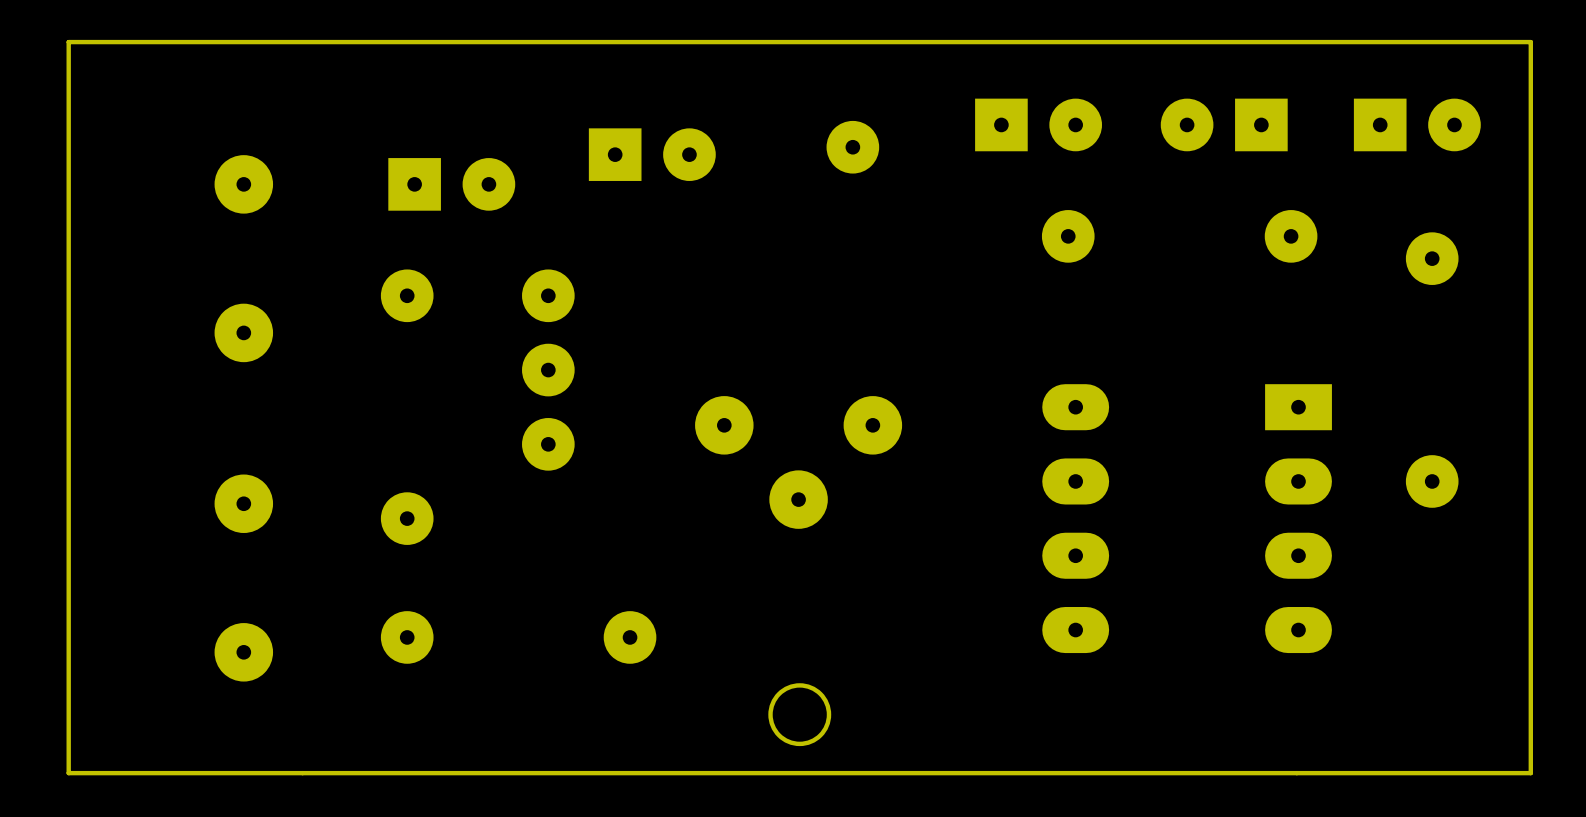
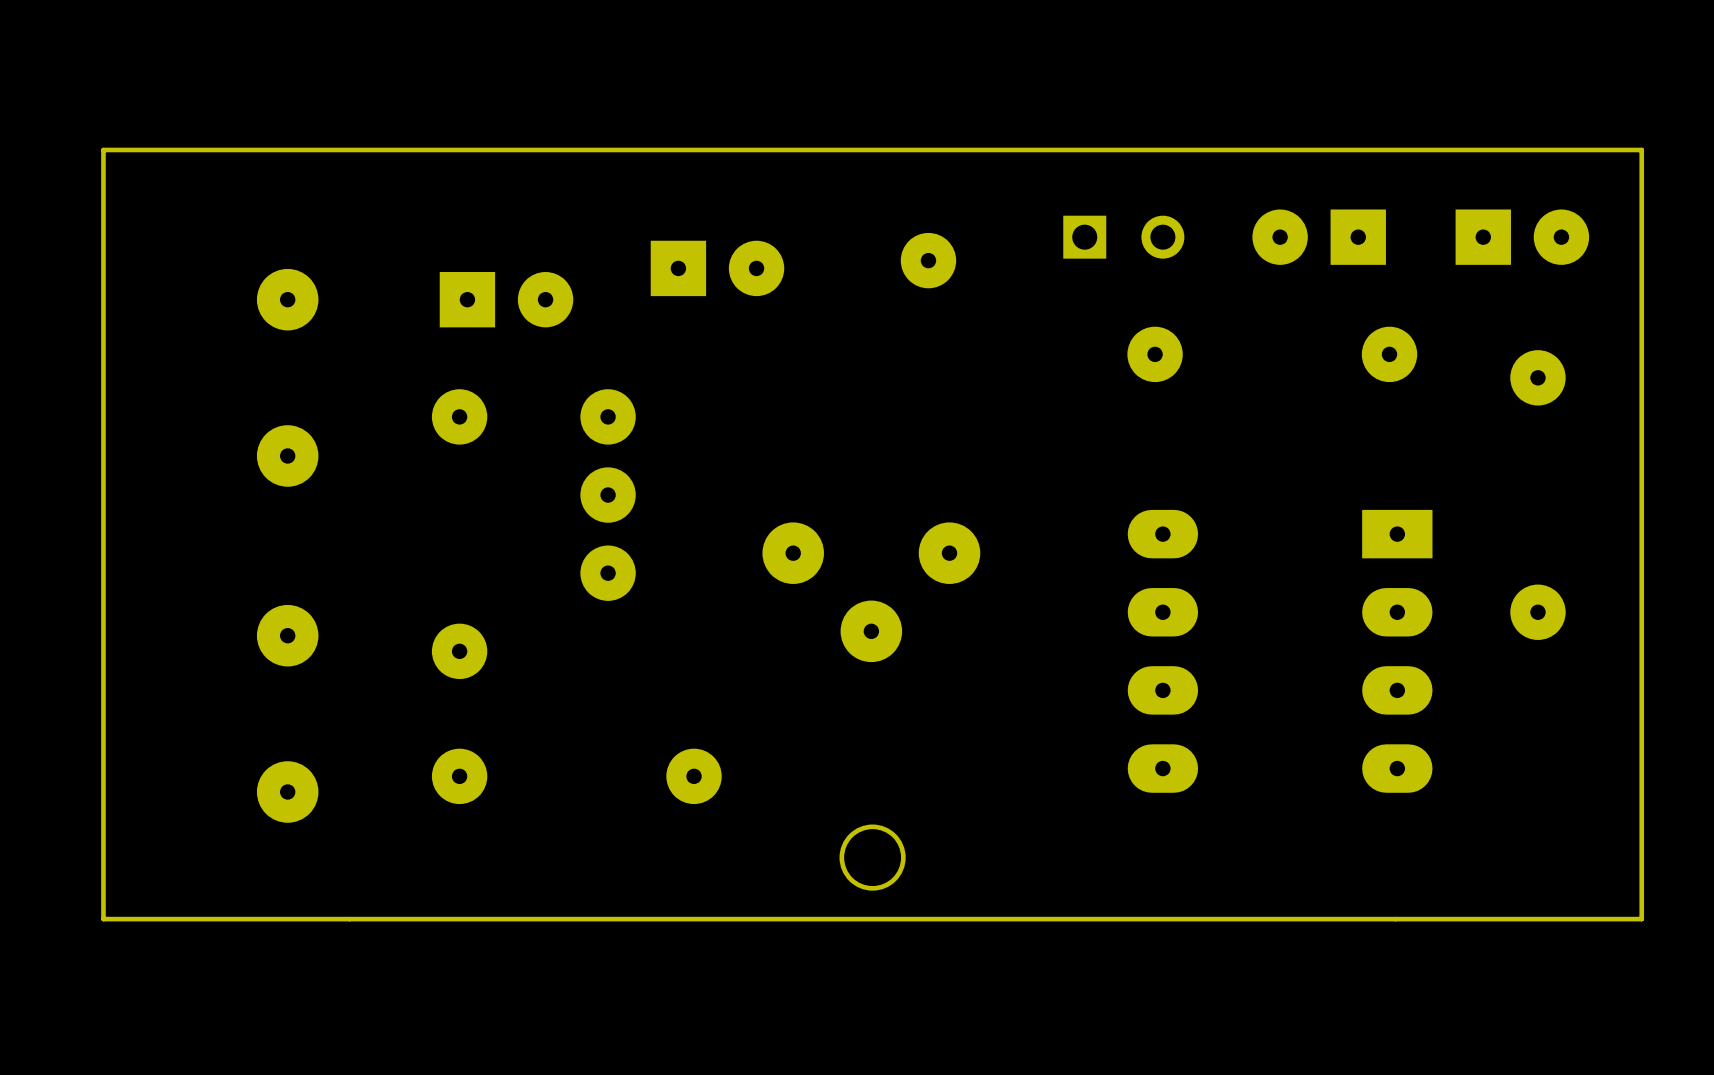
part footprint: [975, 98, 1103, 152] -> [1063, 215, 1185, 259]

